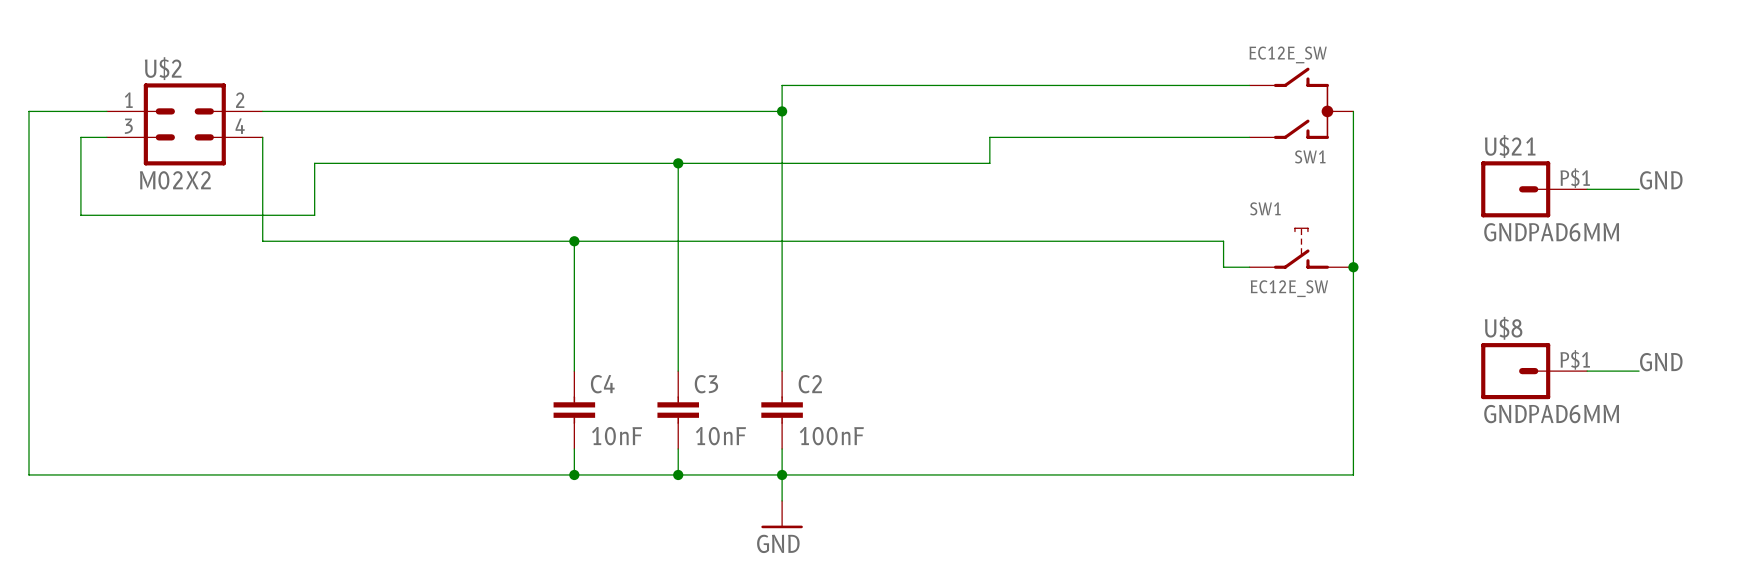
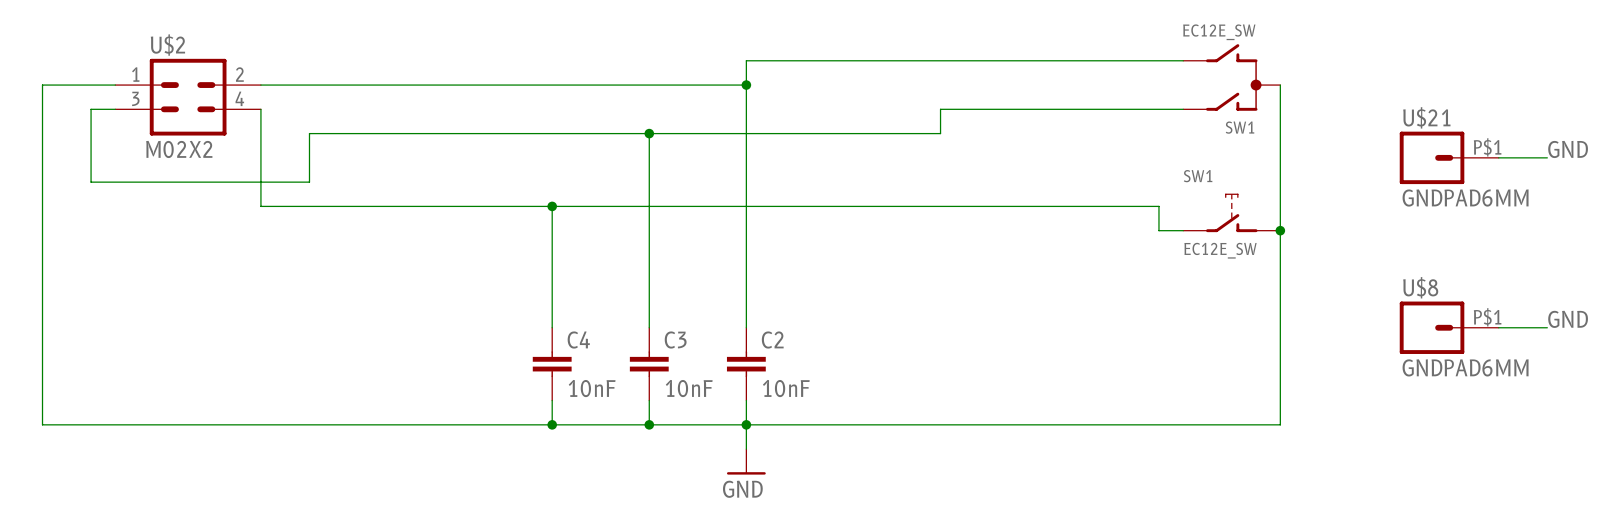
C2 value: 100nF (831, 436) -> 10nF (786, 388)

